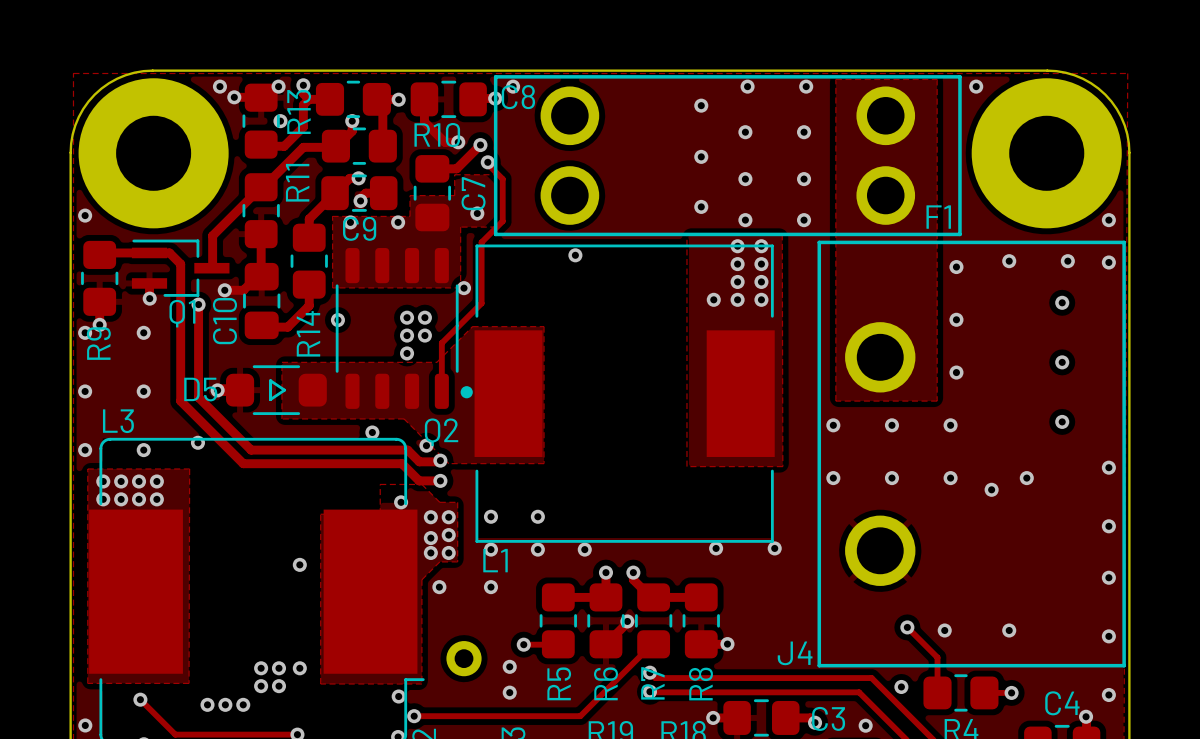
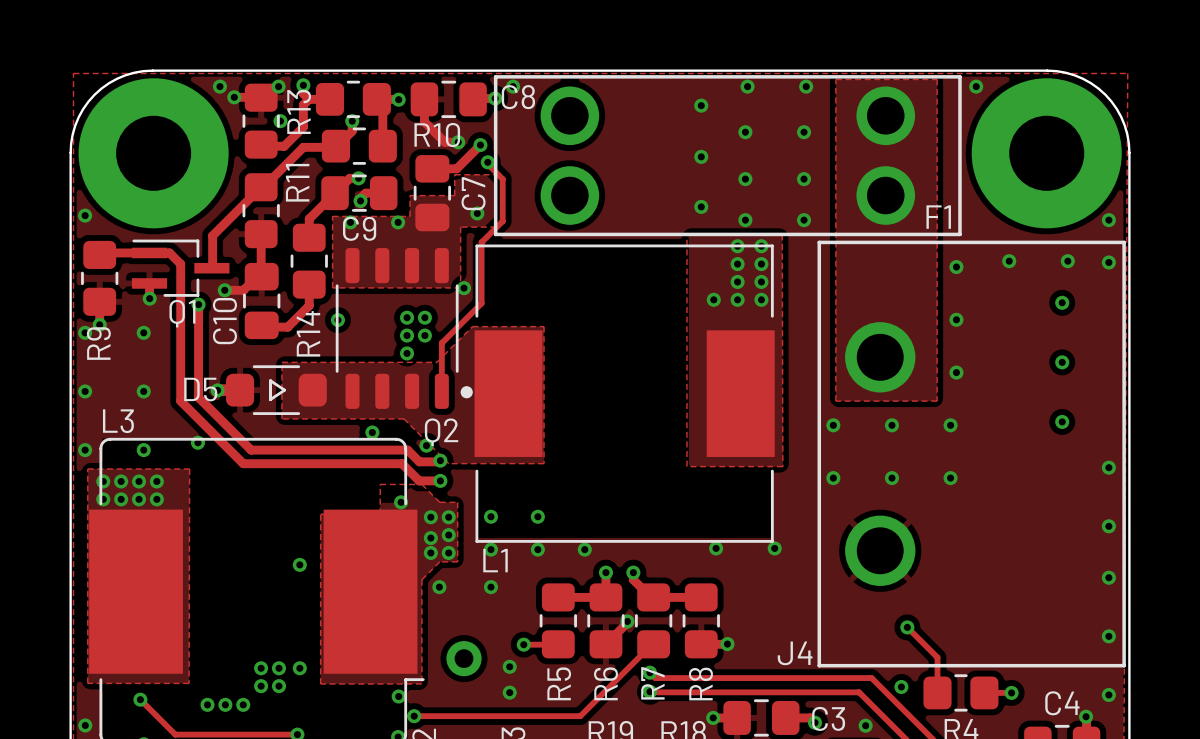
via: (575, 255) -> none
via: (1026, 478) -> none
via: (991, 489) -> none
via: (944, 630) -> none
via: (1009, 630) -> none

